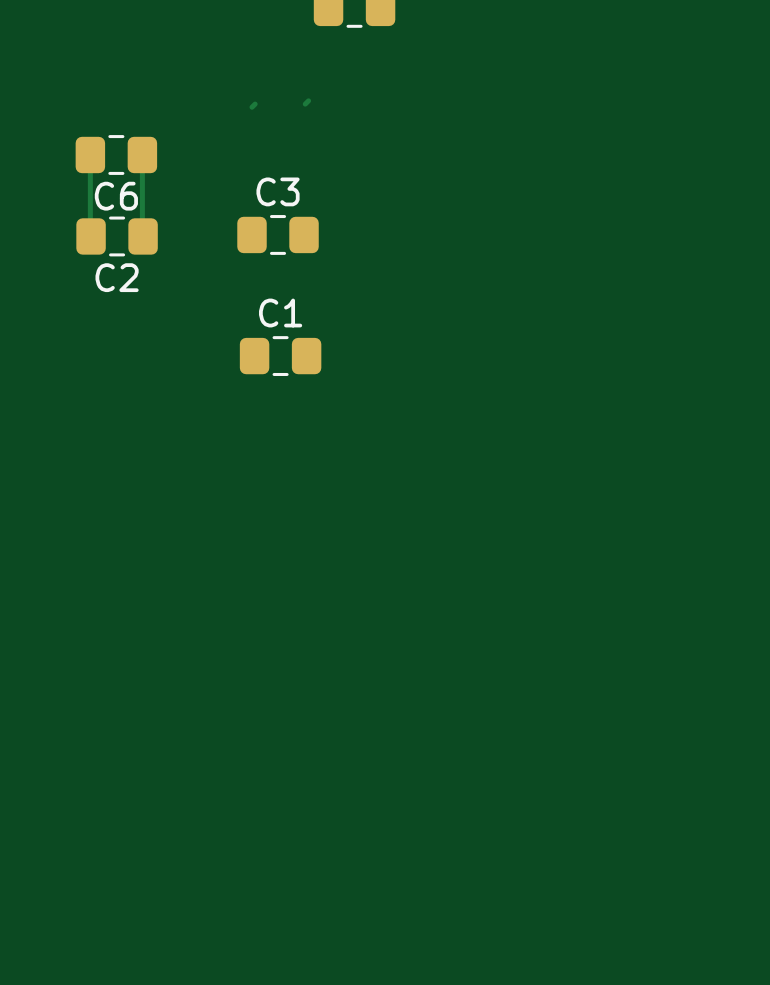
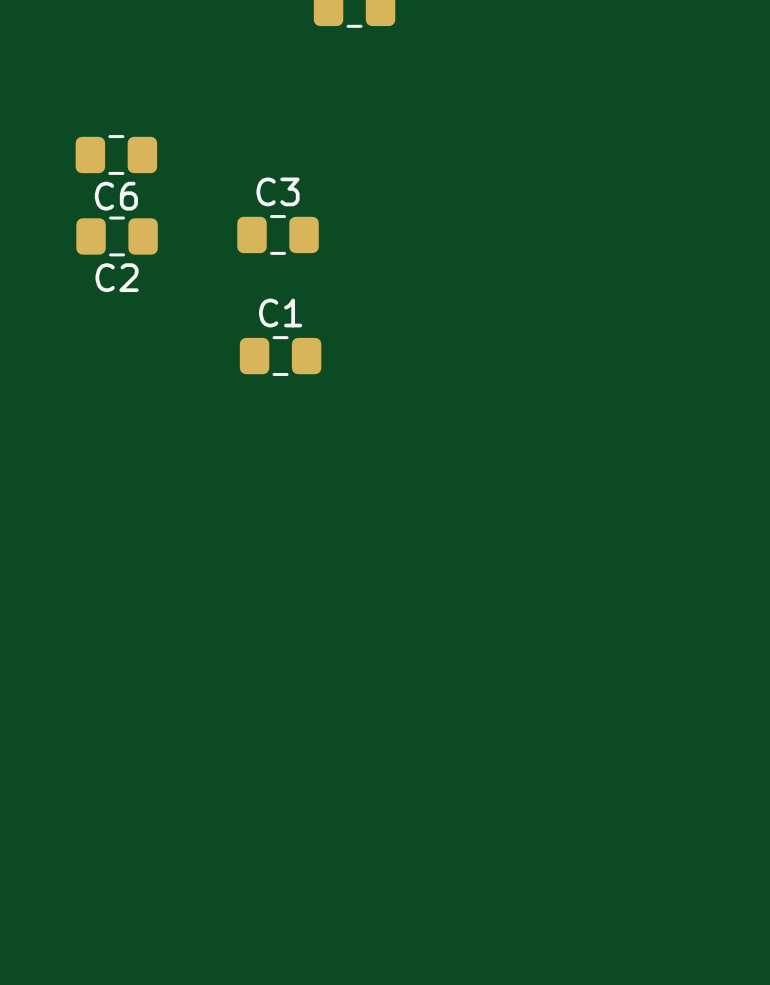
track: (308, 100) (305, 104) -> none
track: (255, 104) (252, 107) -> none
track: (90, 154) (91, 236) (88, 239) -> none
track: (142, 154) (143, 236) -> none

